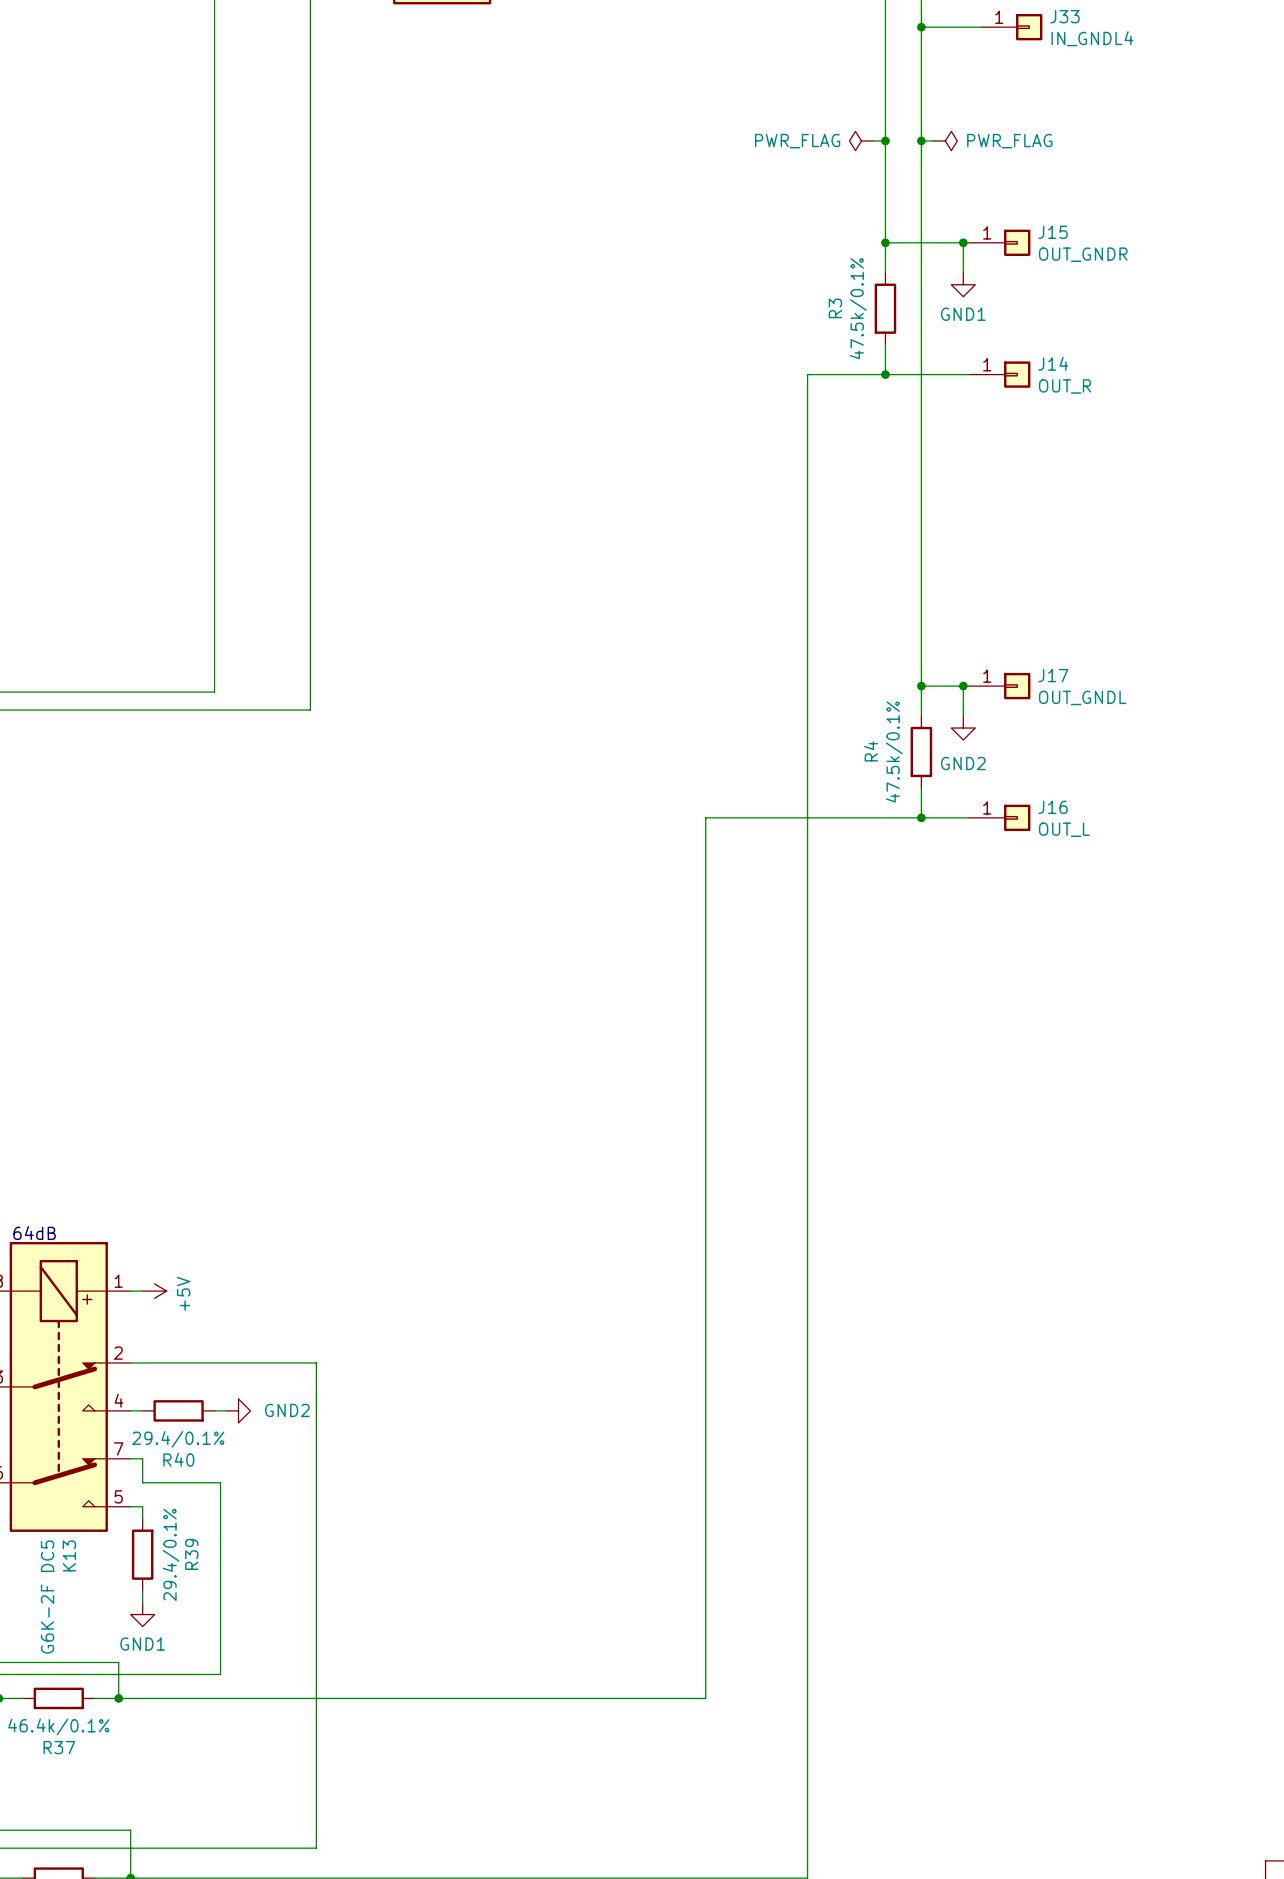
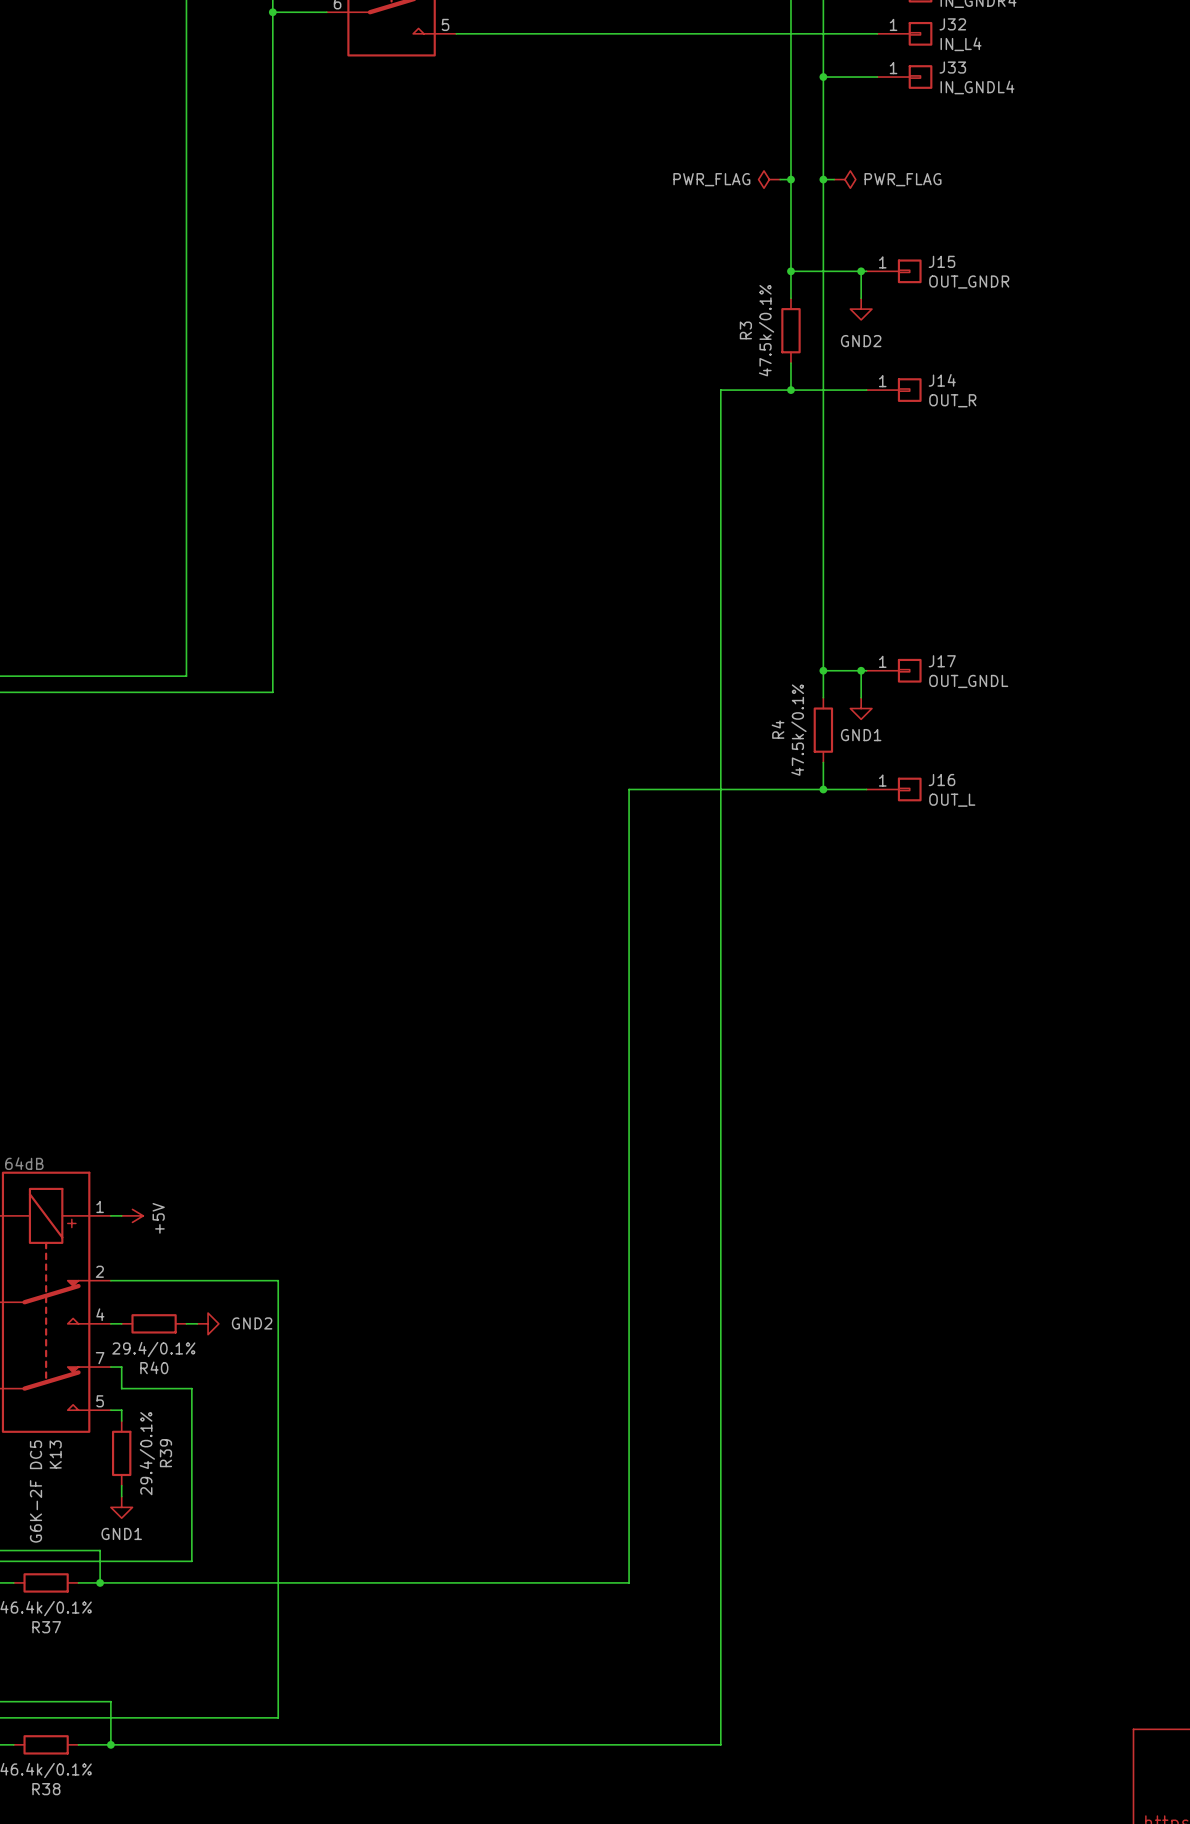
power symbol: GND1 (963, 284) -> GND2 (861, 309)
power symbol: GND2 (963, 728) -> GND1 (861, 708)

